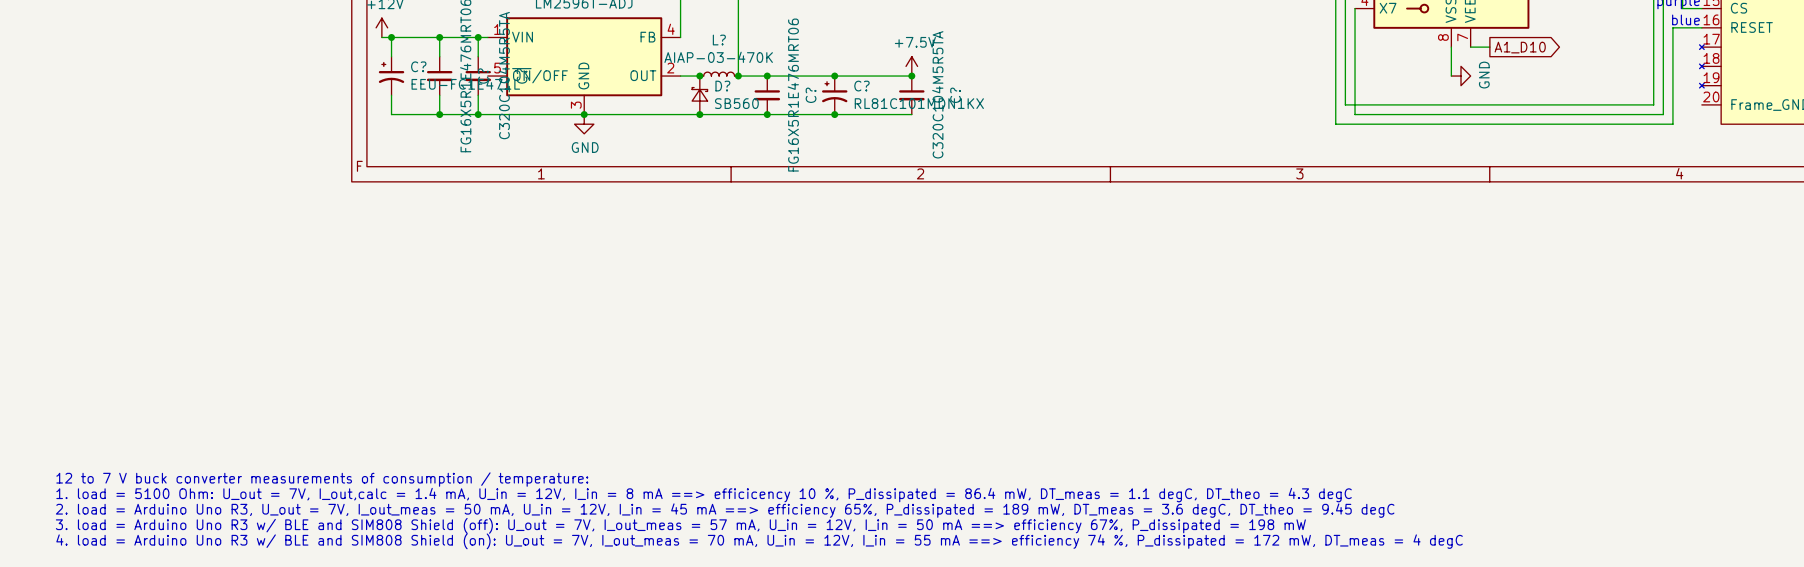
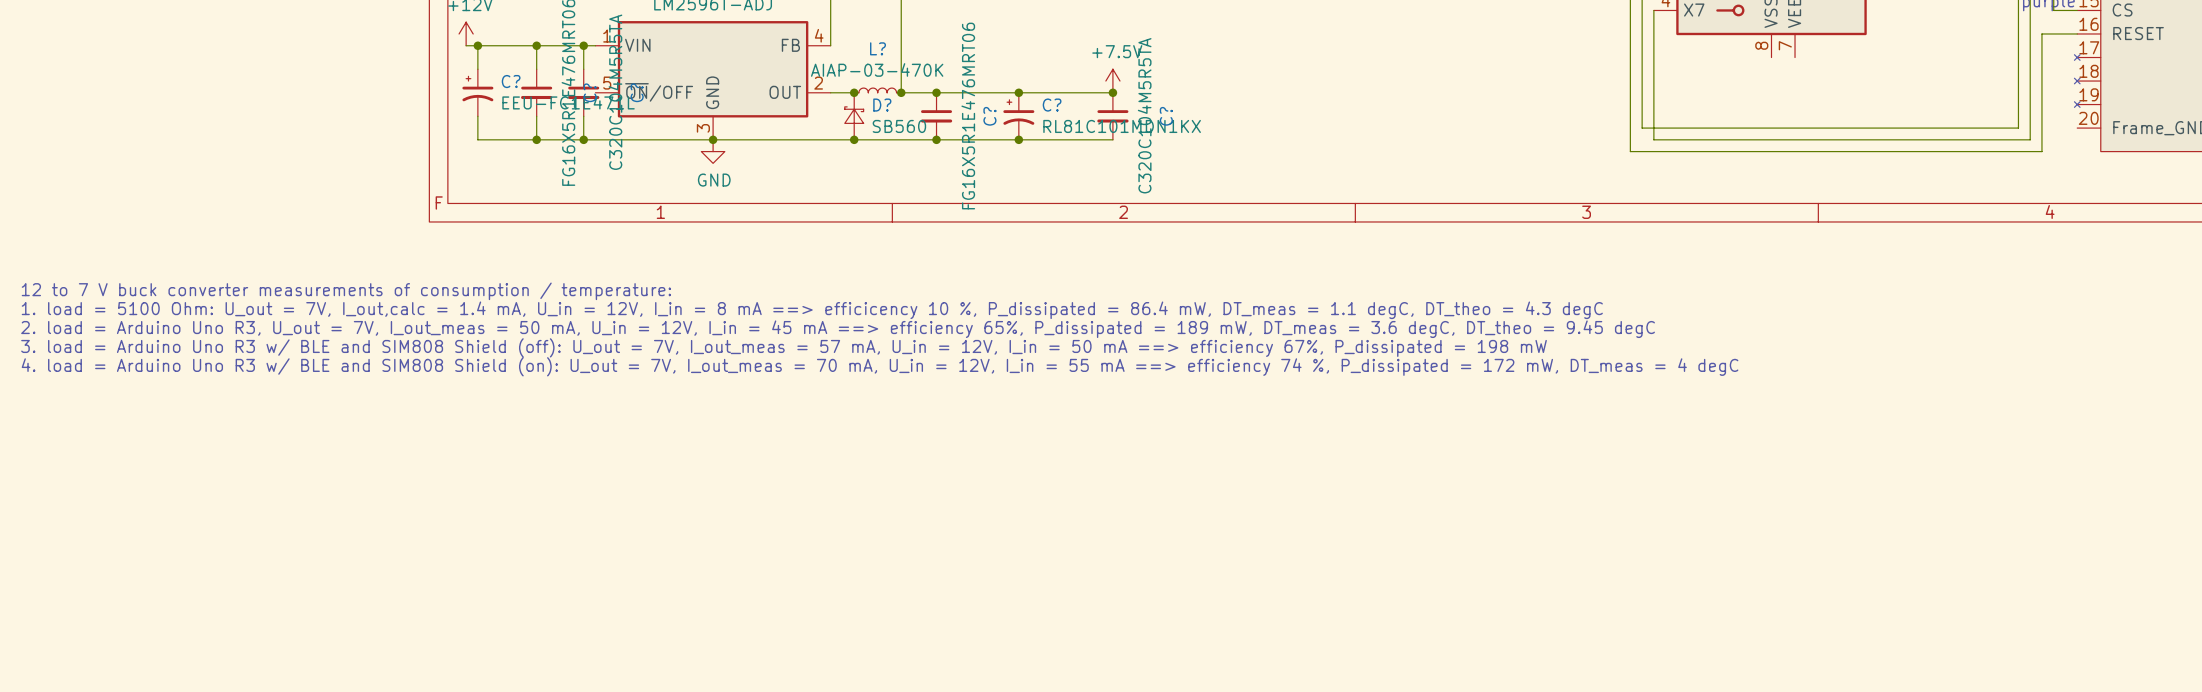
text: blue (1685, 19) -> none
wire: (1451, 47) (1451, 76) -> none
wire: (1470, 47) (1489, 47) -> none
global label: A1_D10 (1520, 47) -> none
power symbol: GND (1460, 76) -> none
text: none -> 12 to 7 V buck converter measurements of consumption / temperature: (346, 291)
text: none -> 1. load = 5100 Ohm: U_out = 7V, I_out,calc = 1.4 mA, U_in = 12V, I_in = 8 mA ==> efficicency 10 %, P_dissipated = 86.4 mW, DT_meas = 1.1 degC, DT_theo = 4.3 degC (812, 310)
text: none -> 2. load = Arduino Uno R3, U_out = 7V, I_out_meas = 50 mA, U_in = 12V, I_in = 45 mA ==> efficiency 65%, P_dissipated = 189 mW, DT_meas = 3.6 degC, DT_theo = 9.45 degC (838, 329)
text: none -> 3. load = Arduino Uno R3 w/ BLE and SIM808 Shield (off): U_out = 7V, I_out_meas = 57 mA, U_in = 12V, I_in = 50 mA ==> efficiency 67%, P_dissipated = 198 mW (784, 347)
text: none -> 4. load = Arduino Uno R3 w/ BLE and SIM808 Shield (on): U_out = 7V, I_out_meas = 70 mA, U_in = 12V, I_in = 55 mA ==> efficiency 74 %, P_dissipated = 172 mW, DT_meas = 4 degC (880, 366)
text: 12 to 7 V buck converter measurements of consumption / temperature: (322, 479) -> none
text: 1. load = 5100 Ohm: U_out = 7V, I_out,calc = 1.4 mA, U_in = 12V, I_in = 8 mA ==> efficicency 10 %, P_dissipated = 86.4 mW, DT_meas = 1.1 degC, DT_theo = 4.3 degC (704, 495) -> none
text: 2. load = Arduino Uno R3, U_out = 7V, I_out_meas = 50 mA, U_in = 12V, I_in = 45 mA ==> efficiency 65%, P_dissipated = 189 mW, DT_meas = 3.6 degC, DT_theo = 9.45 degC (725, 510) -> none
text: 3. load = Arduino Uno R3 w/ BLE and SIM808 Shield (off): U_out = 7V, I_out_meas = 57 mA, U_in = 12V, I_in = 50 mA ==> efficiency 67%, P_dissipated = 198 mW (680, 525) -> none
text: 4. load = Arduino Uno R3 w/ BLE and SIM808 Shield (on): U_out = 7V, I_out_meas = 70 mA, U_in = 12V, I_in = 55 mA ==> efficiency 74 %, P_dissipated = 172 mW, DT_meas = 4 degC (759, 541) -> none

